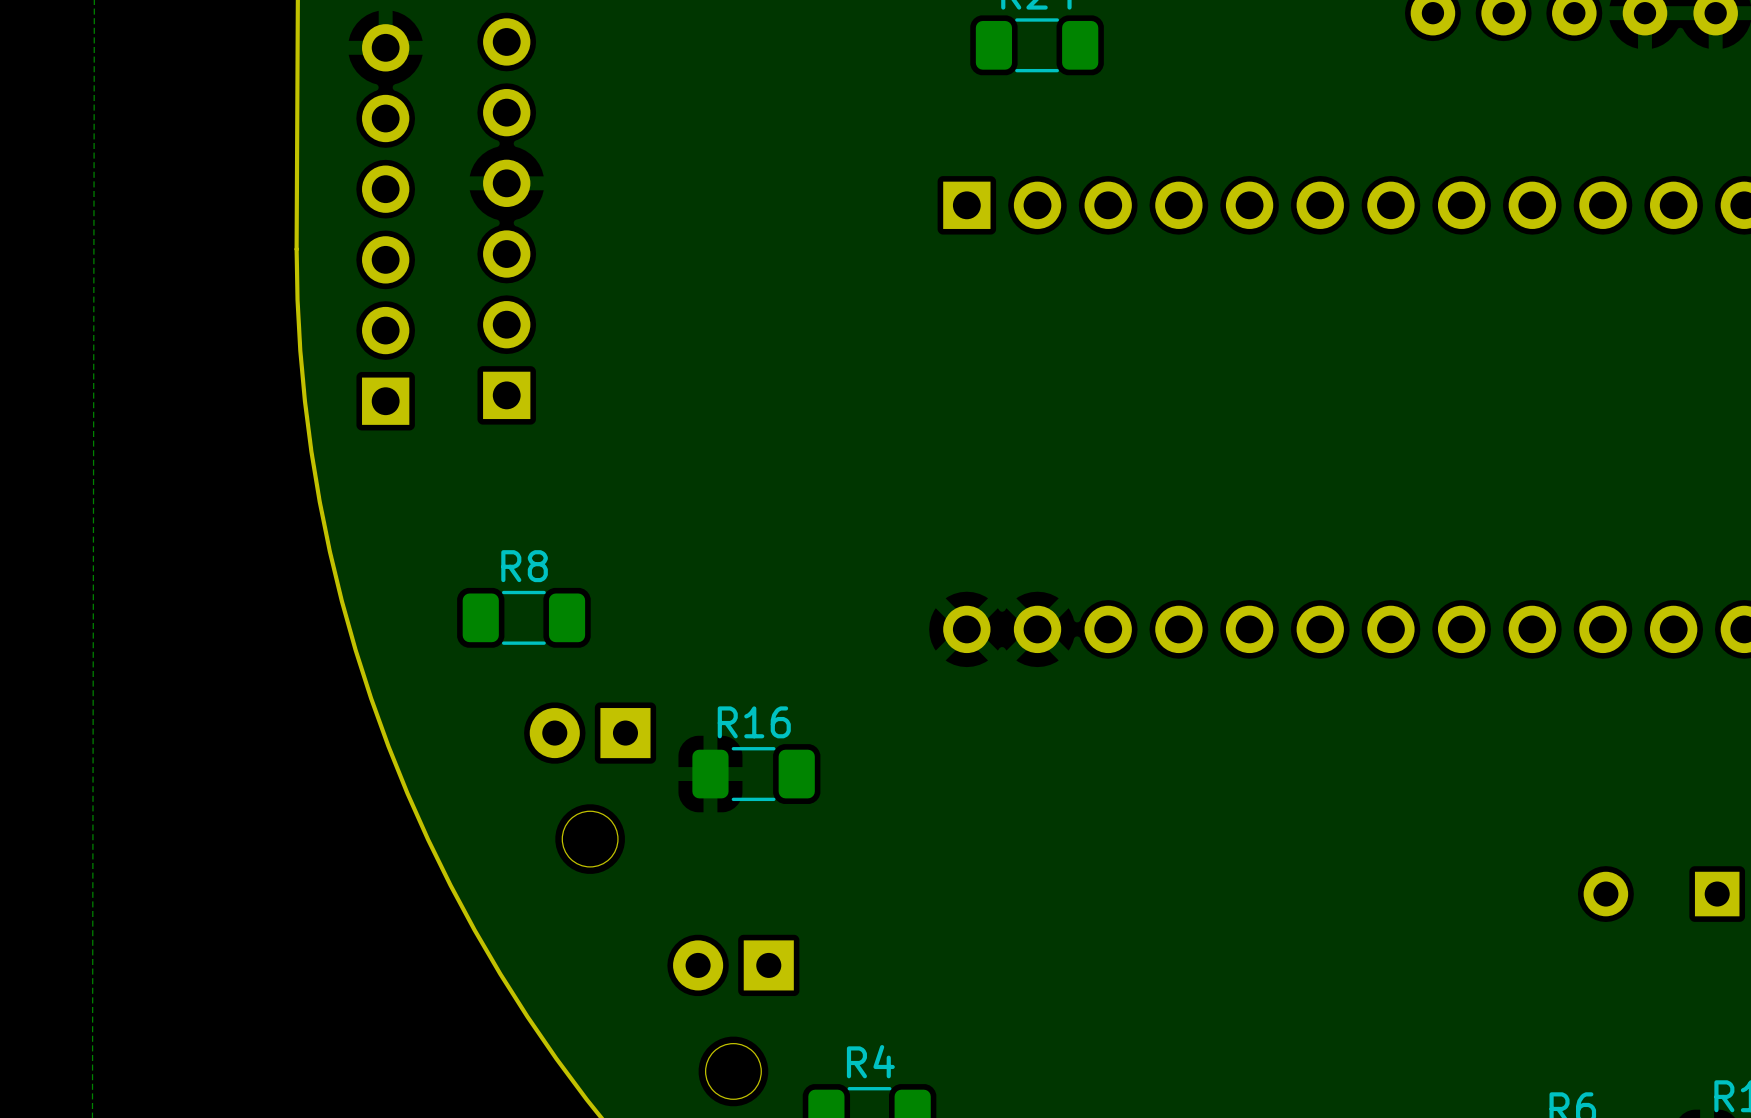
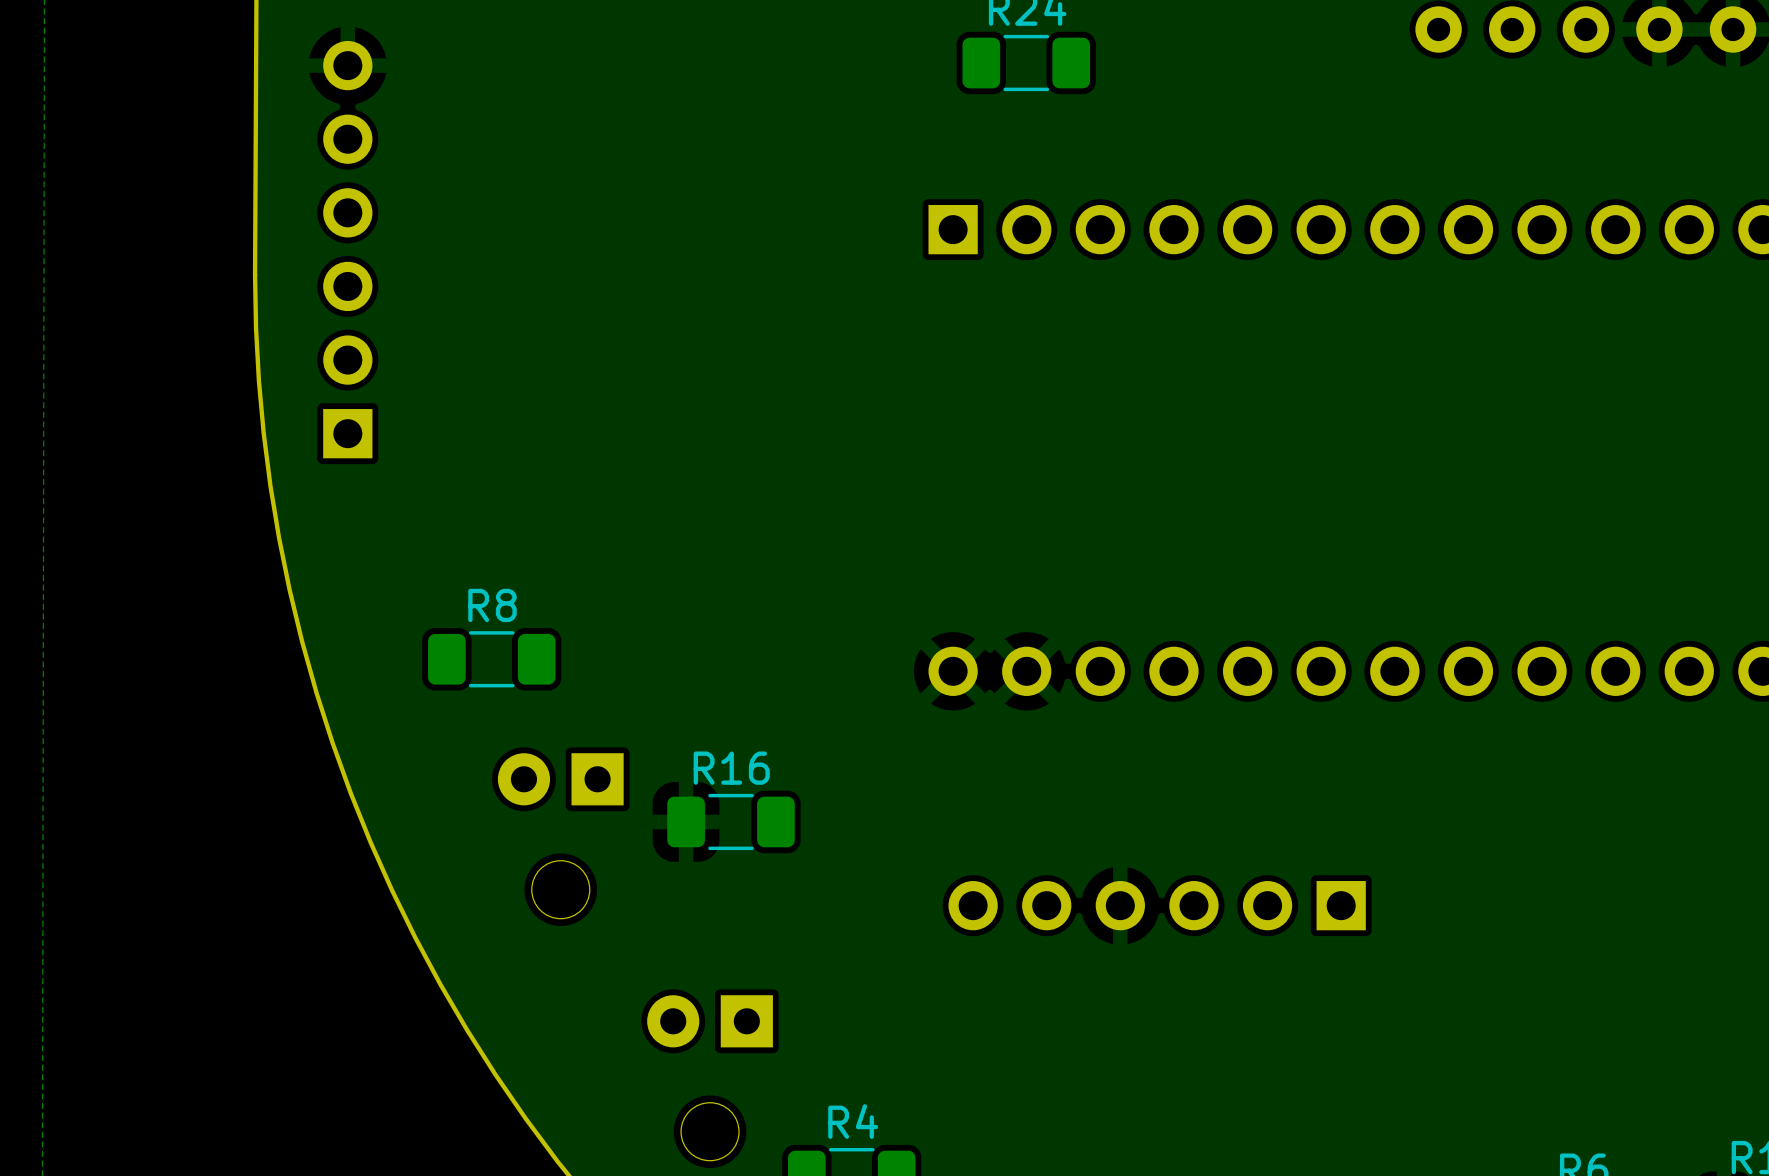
part: (506, 218) -> none
part: none -> (1157, 905)
part: (1661, 894) -> none

